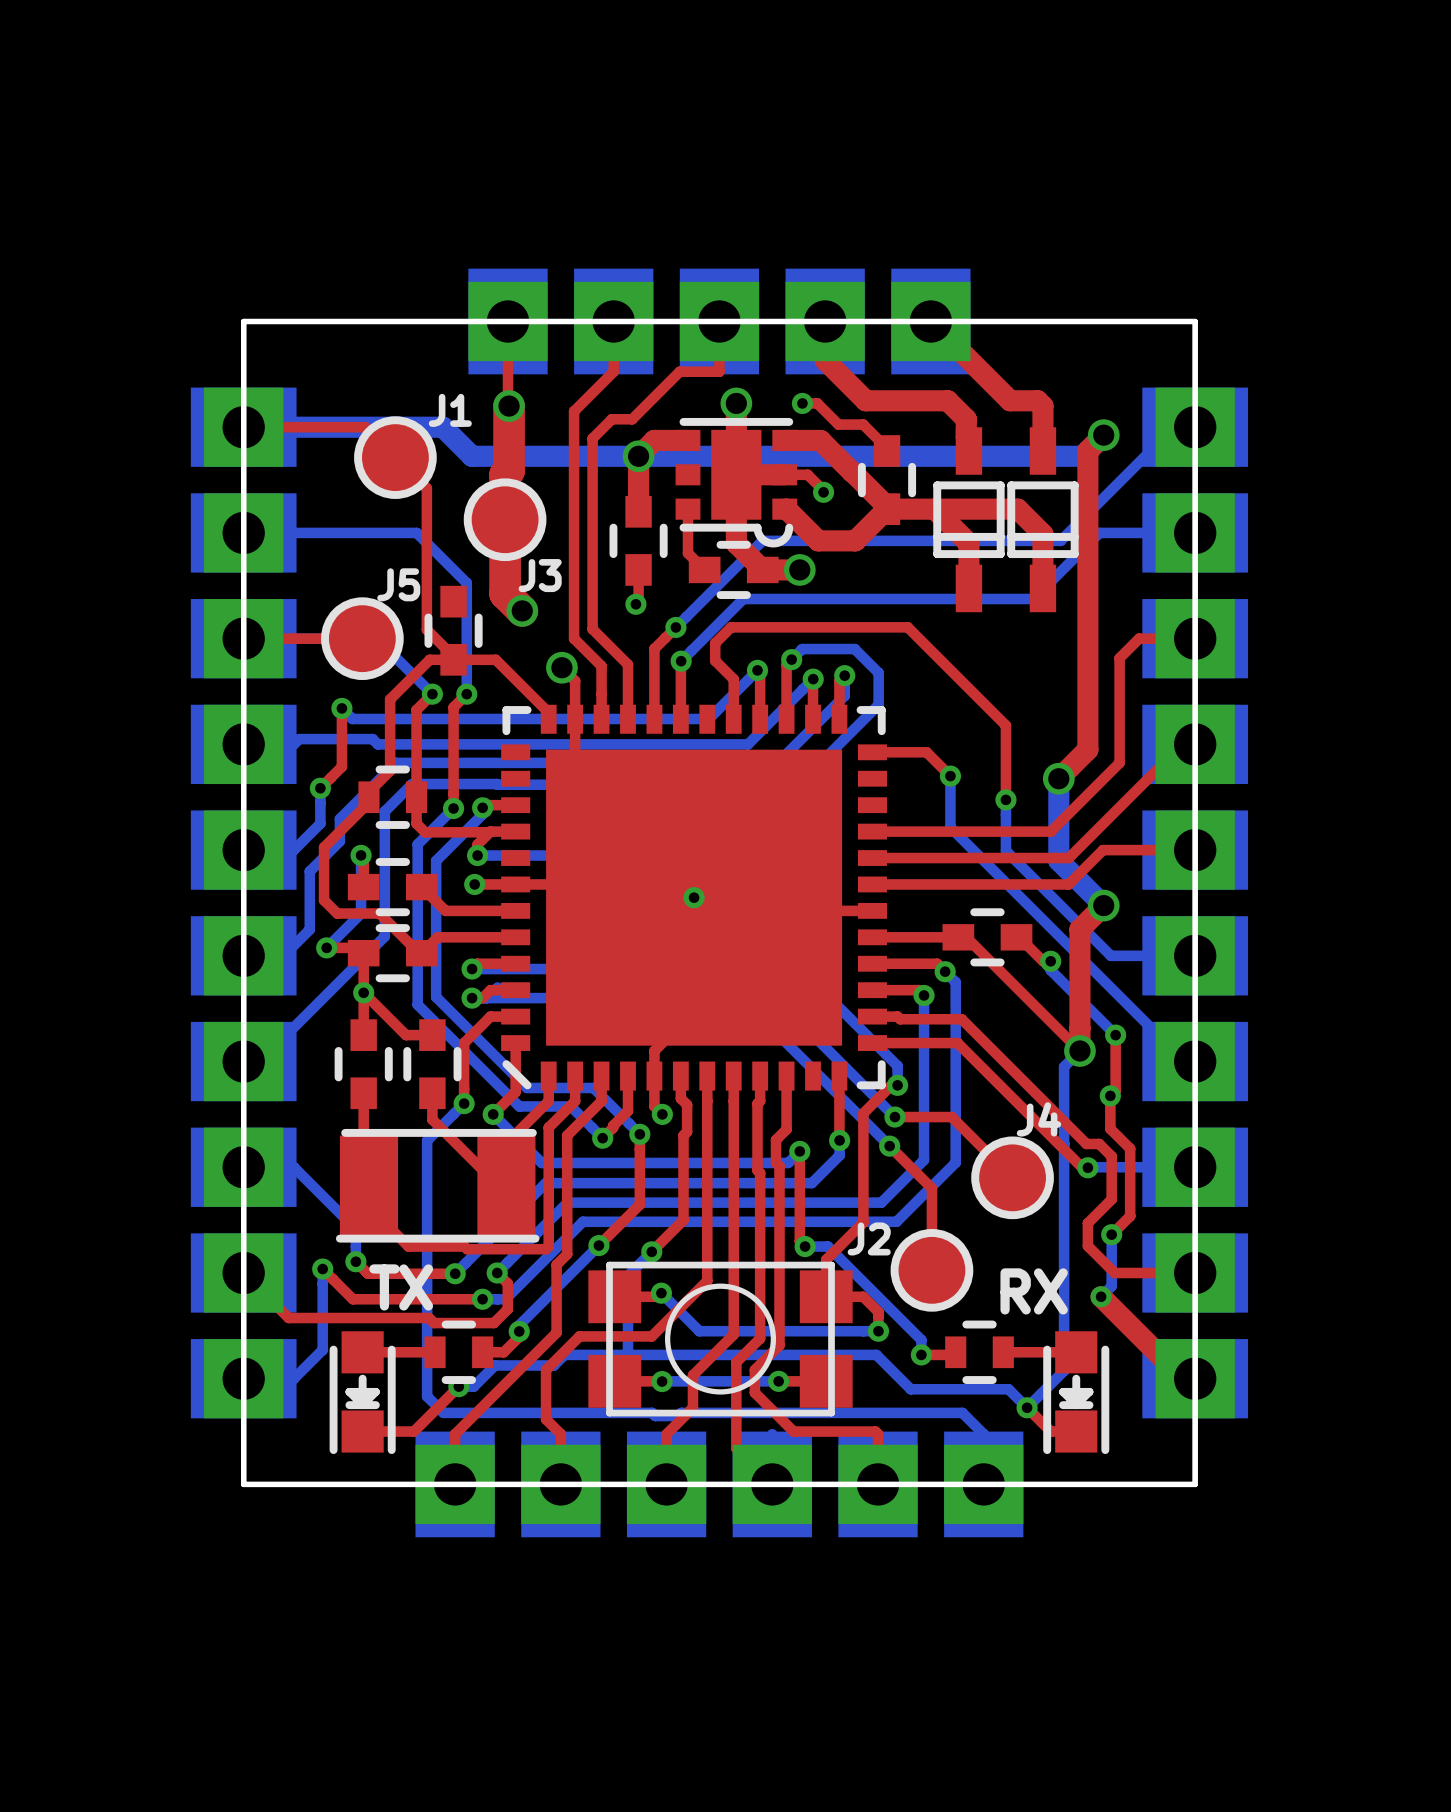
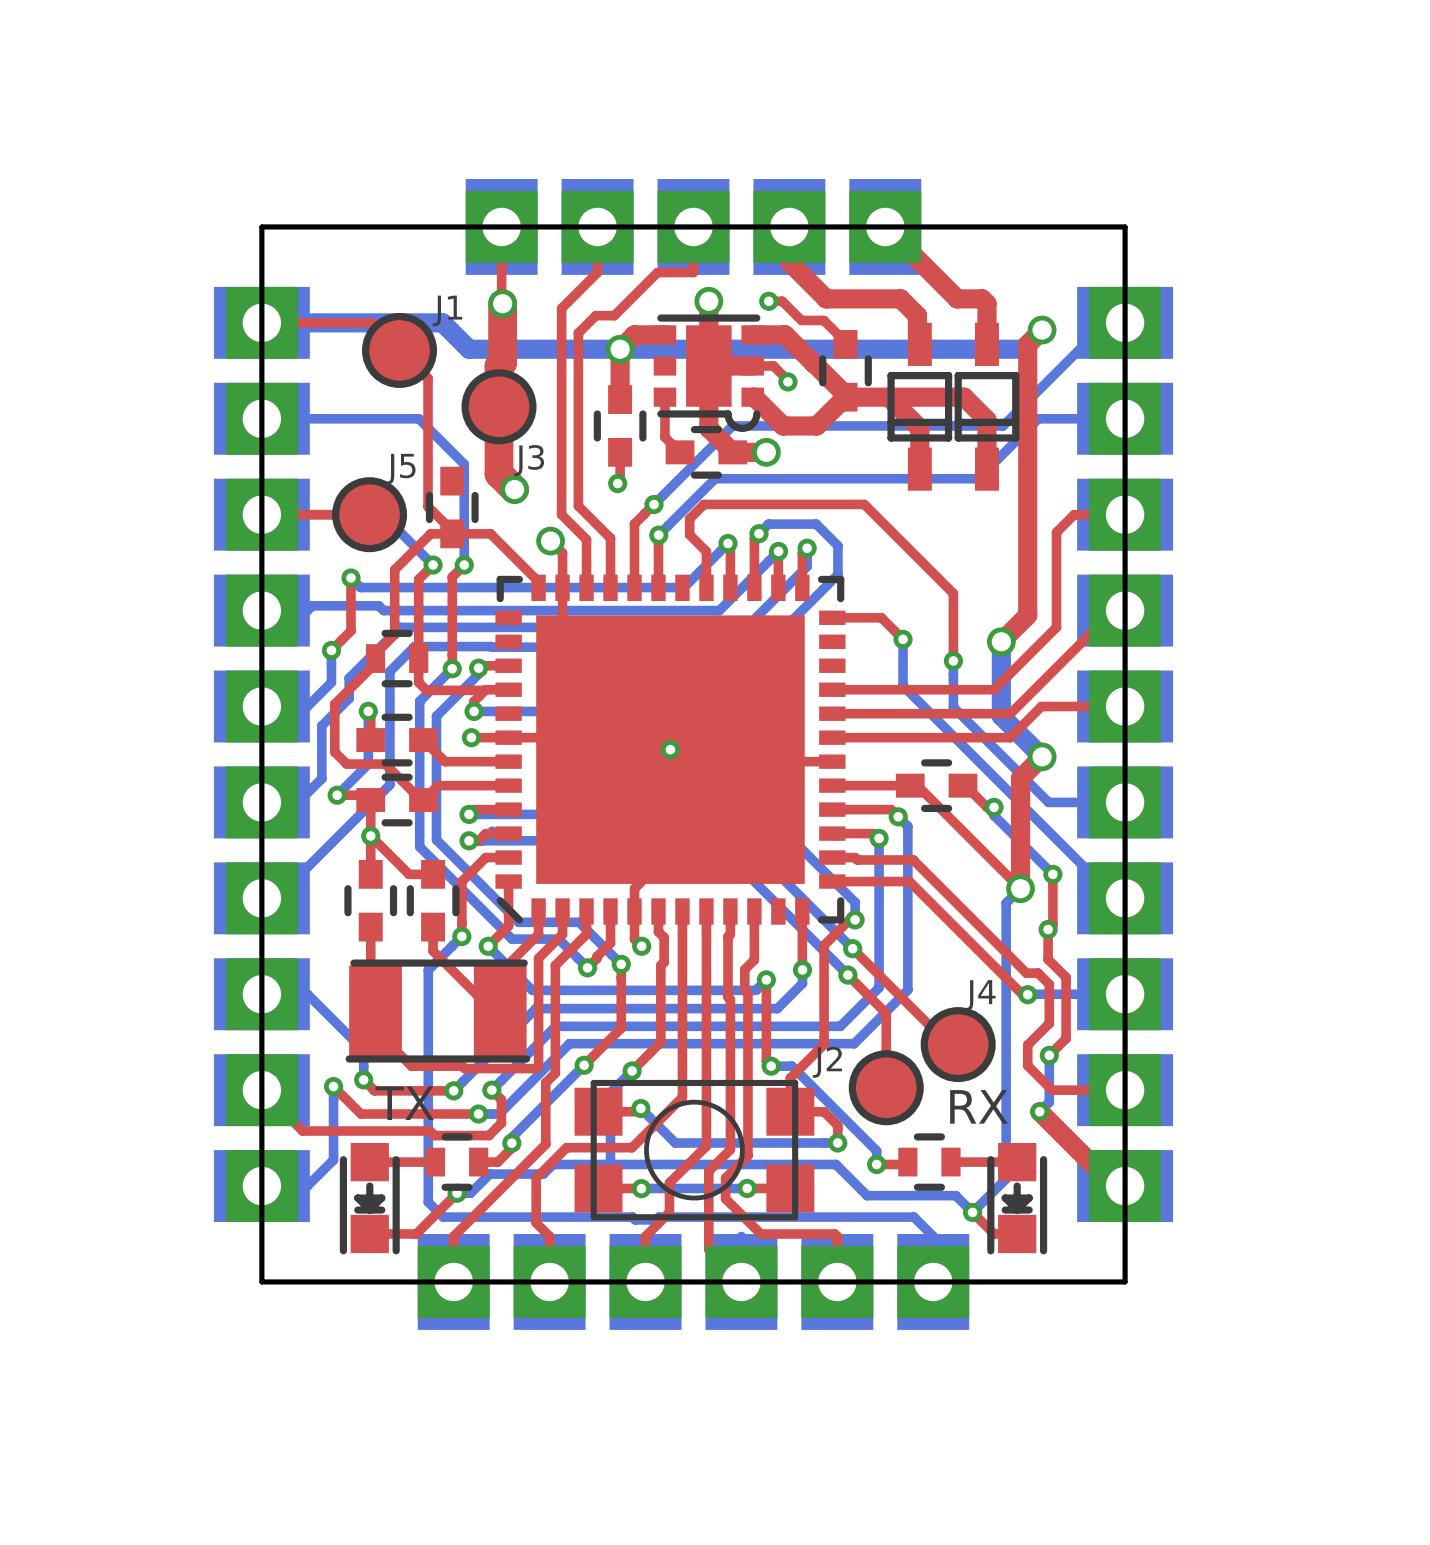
top track: (894, 1117) (951, 1117) (1012, 1177) -> (852, 948) (948, 1044) (958, 1044)
J4 position: (1012, 1177) -> (958, 1044)

